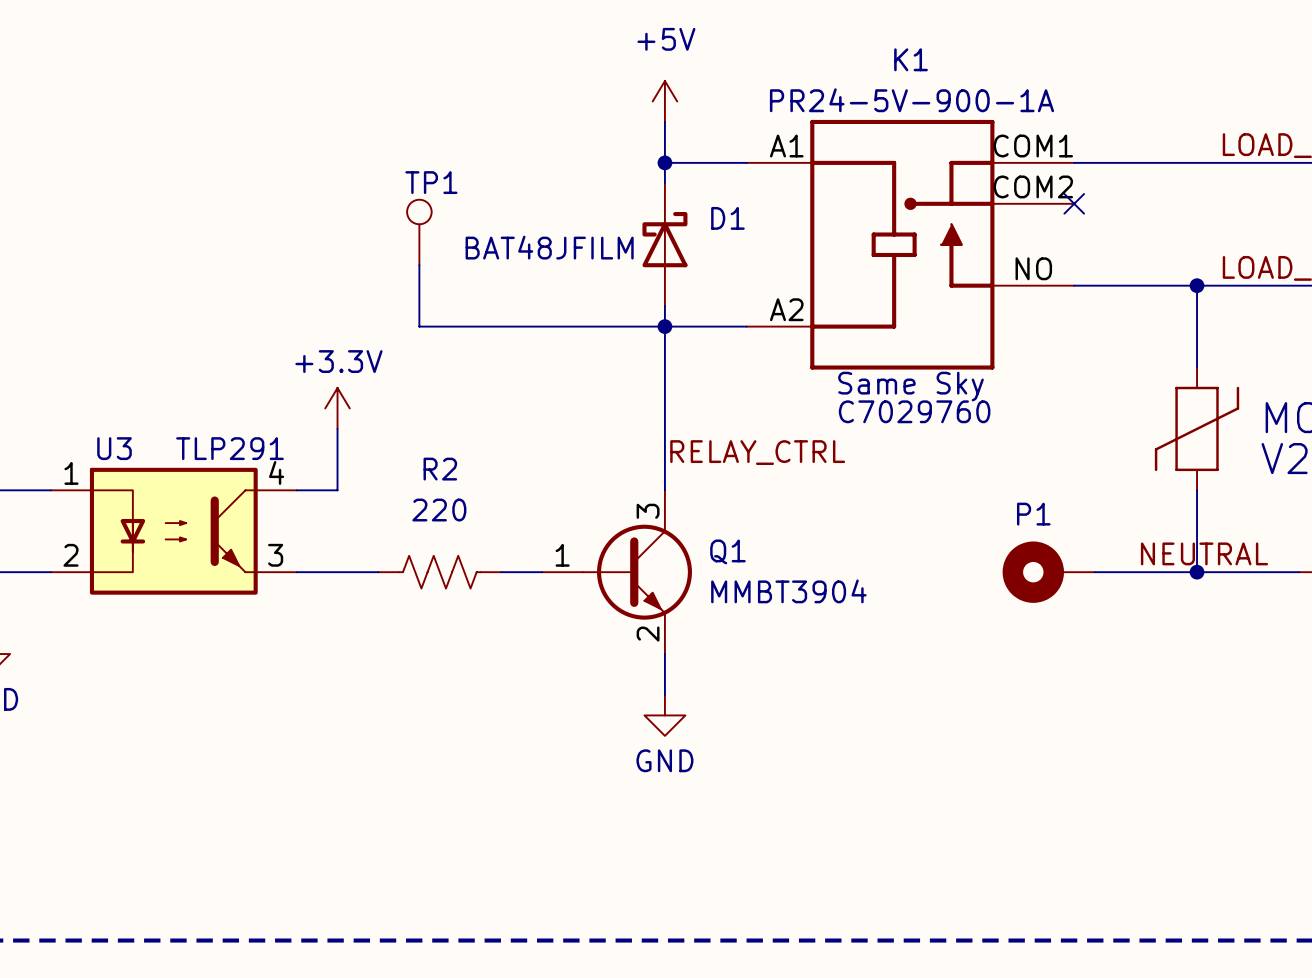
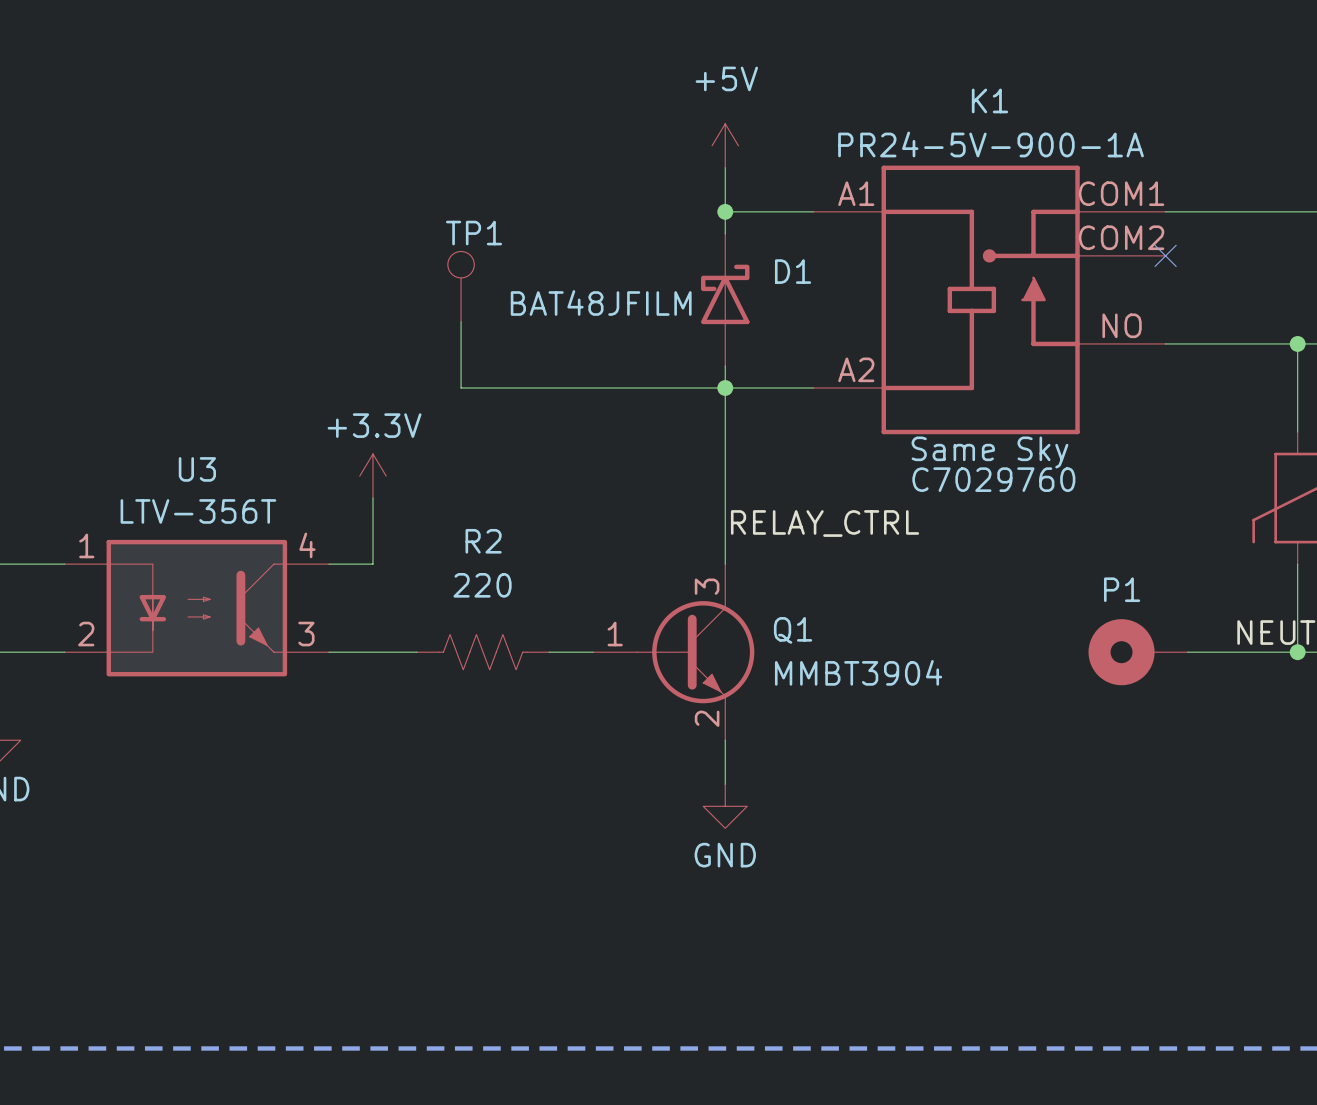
U3 name position: U3 (114, 448) -> U3 (197, 469)
U3 value: TLP291 (229, 448) -> LTV-356T (198, 511)

